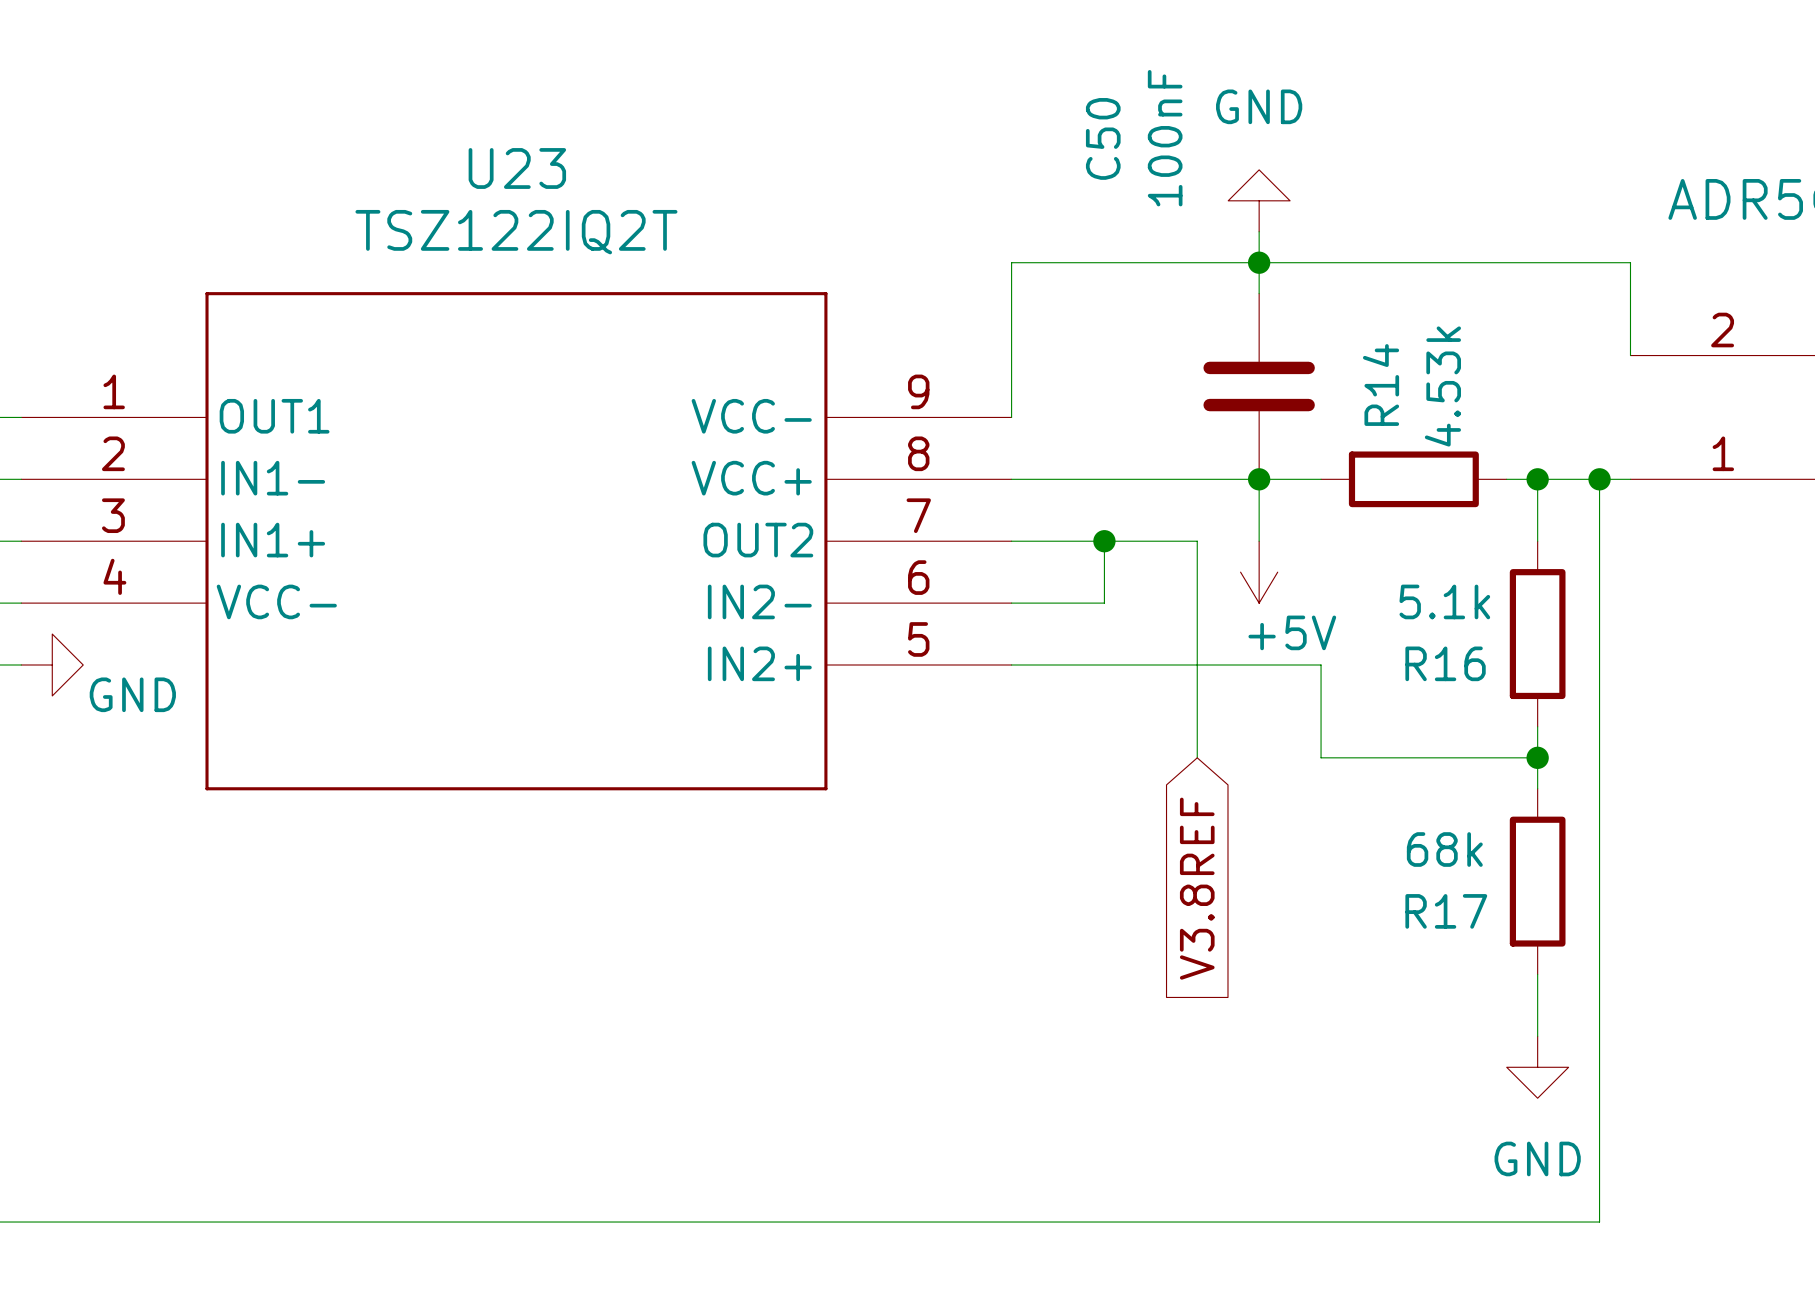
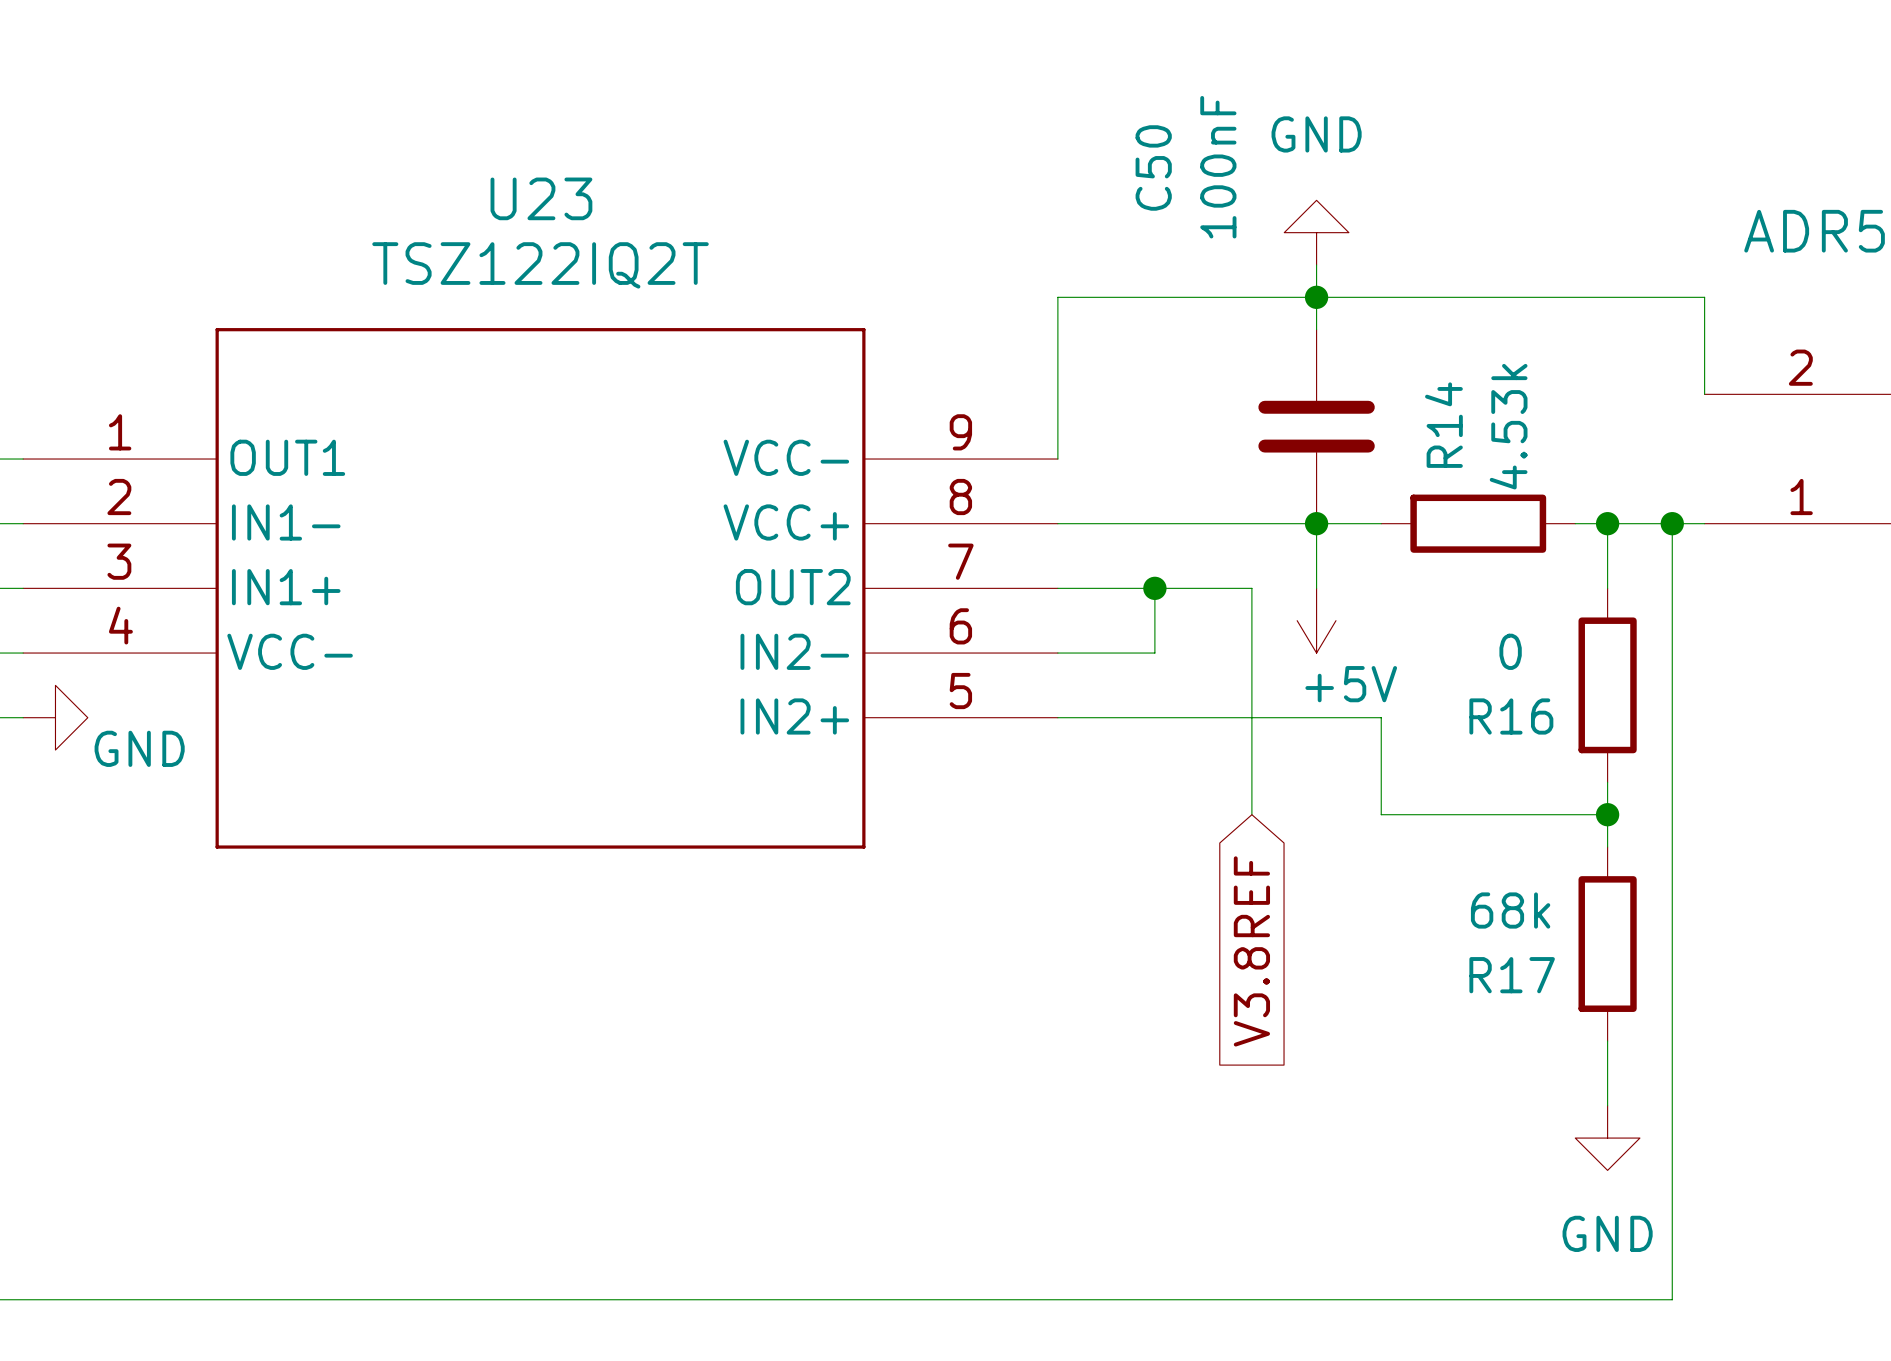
R16 value: 5.1k (1444, 601) -> 0 (1510, 651)

